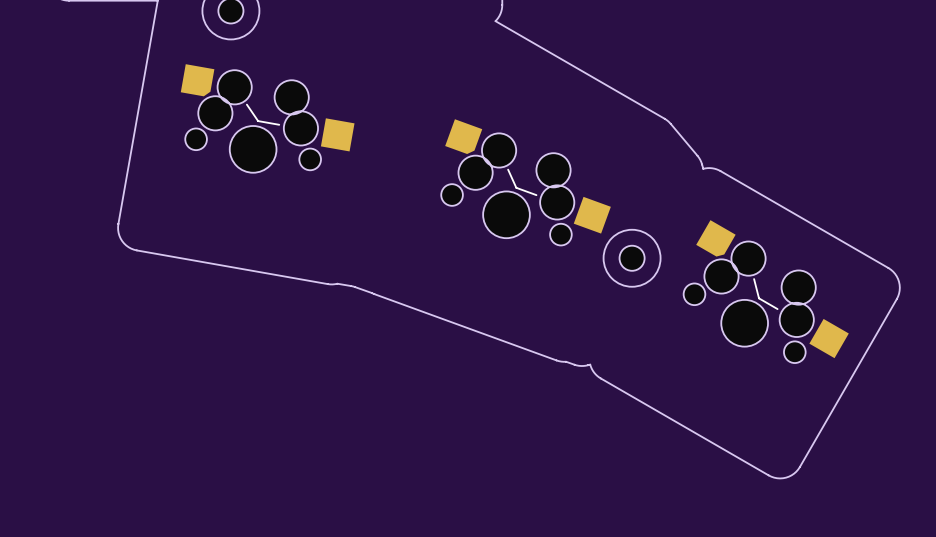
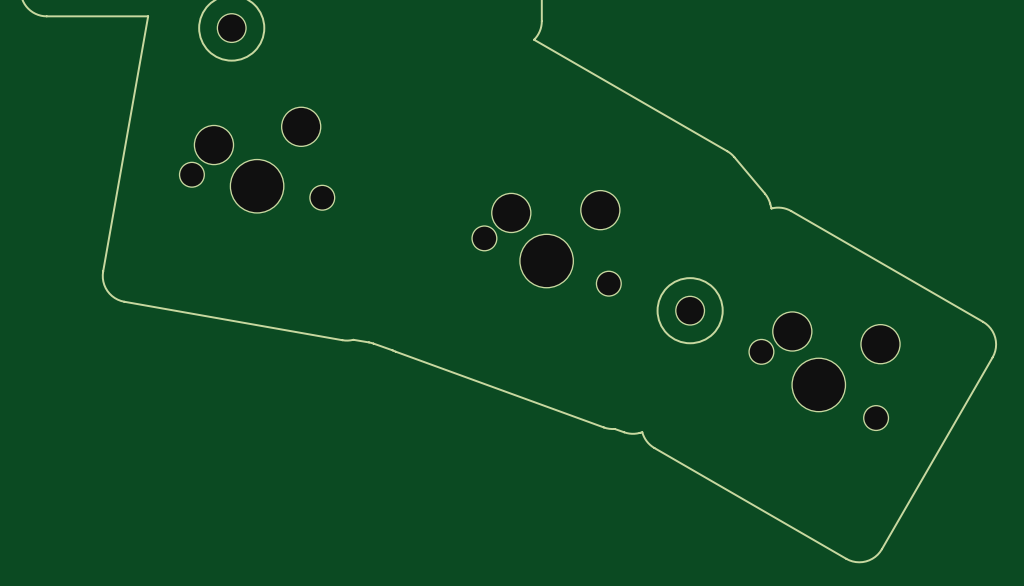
part: (267, 118) -> none
part: none -> (257, 160)
part: (526, 182) -> none
part: none -> (546, 243)
part: (766, 291) -> none
part: none -> (824, 371)

